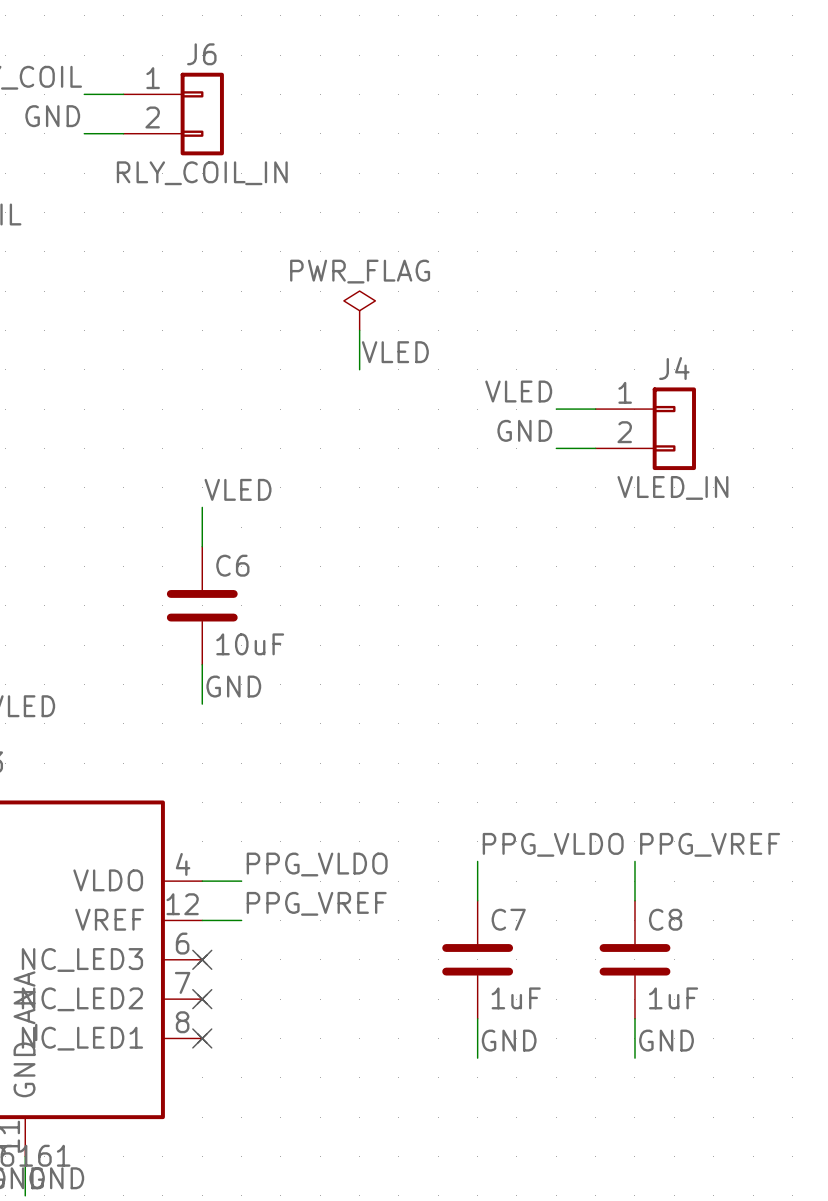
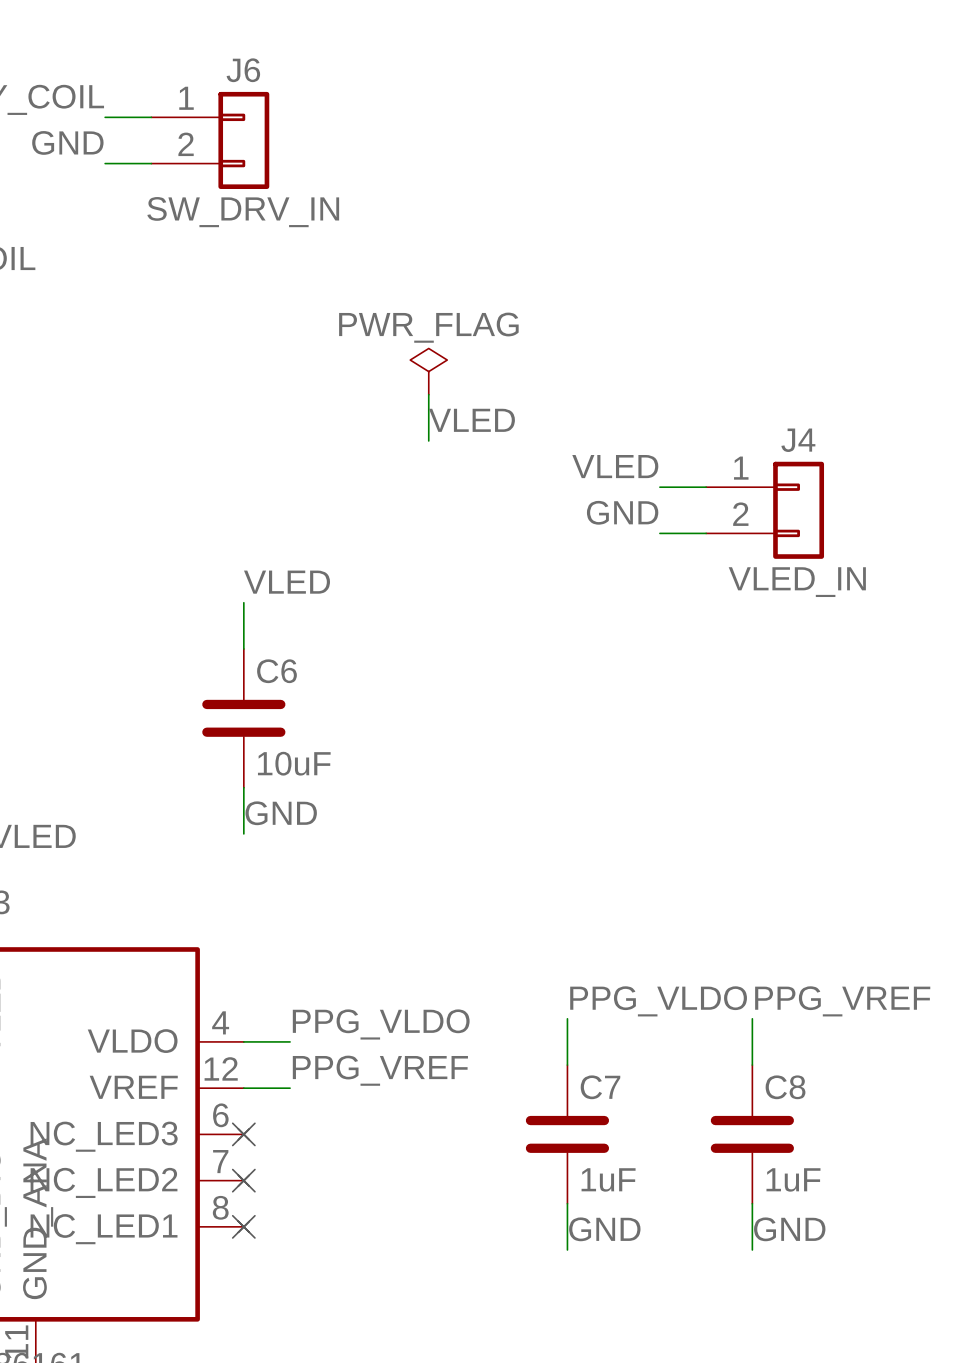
J6 value: RLY_COIL_IN (202, 173) -> SW_DRV_IN (243, 212)

